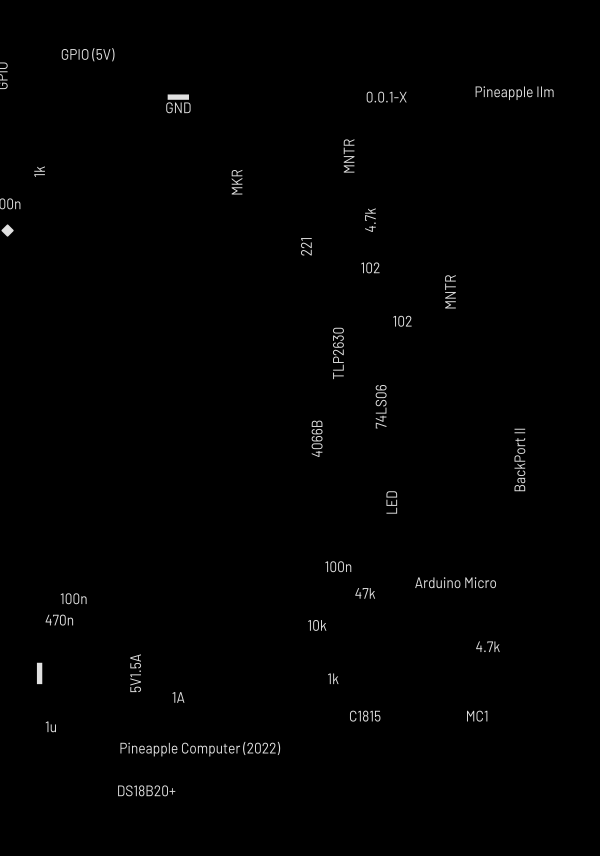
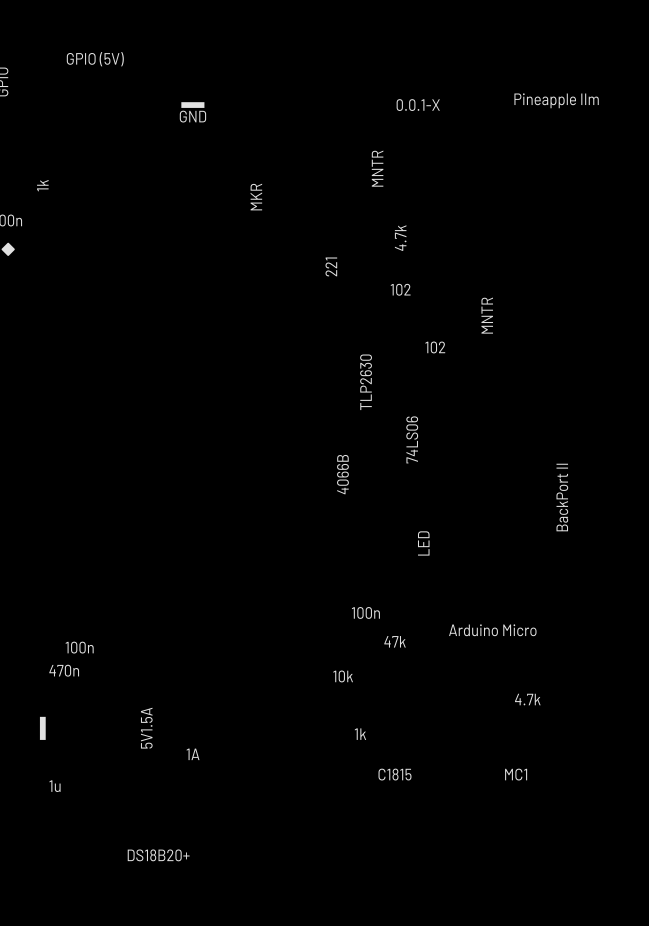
text: Pineapple Computer (2022) (200, 749) -> none

